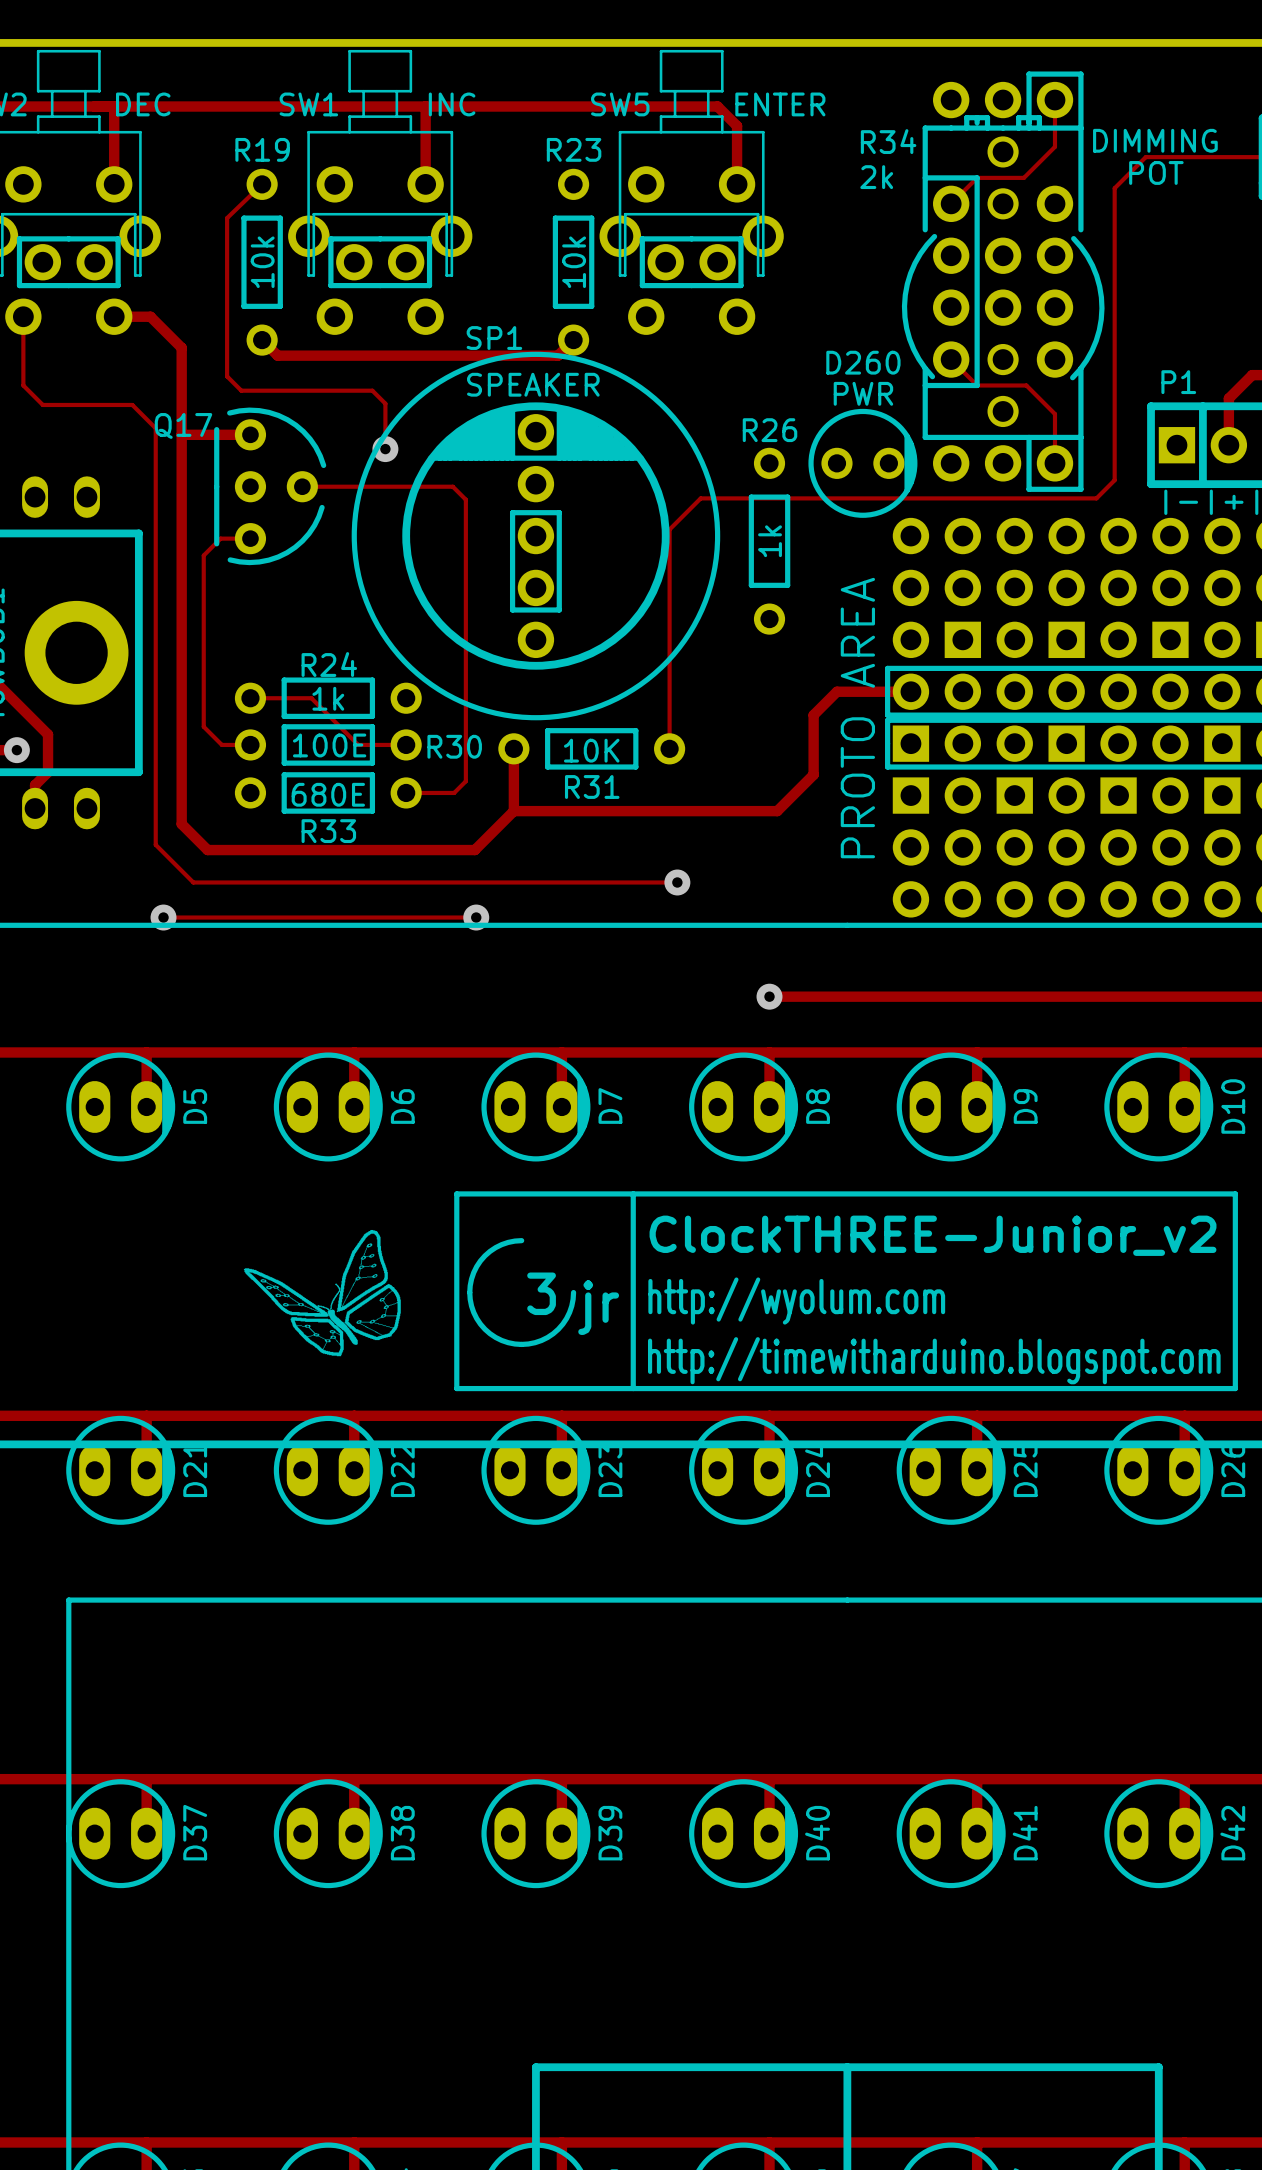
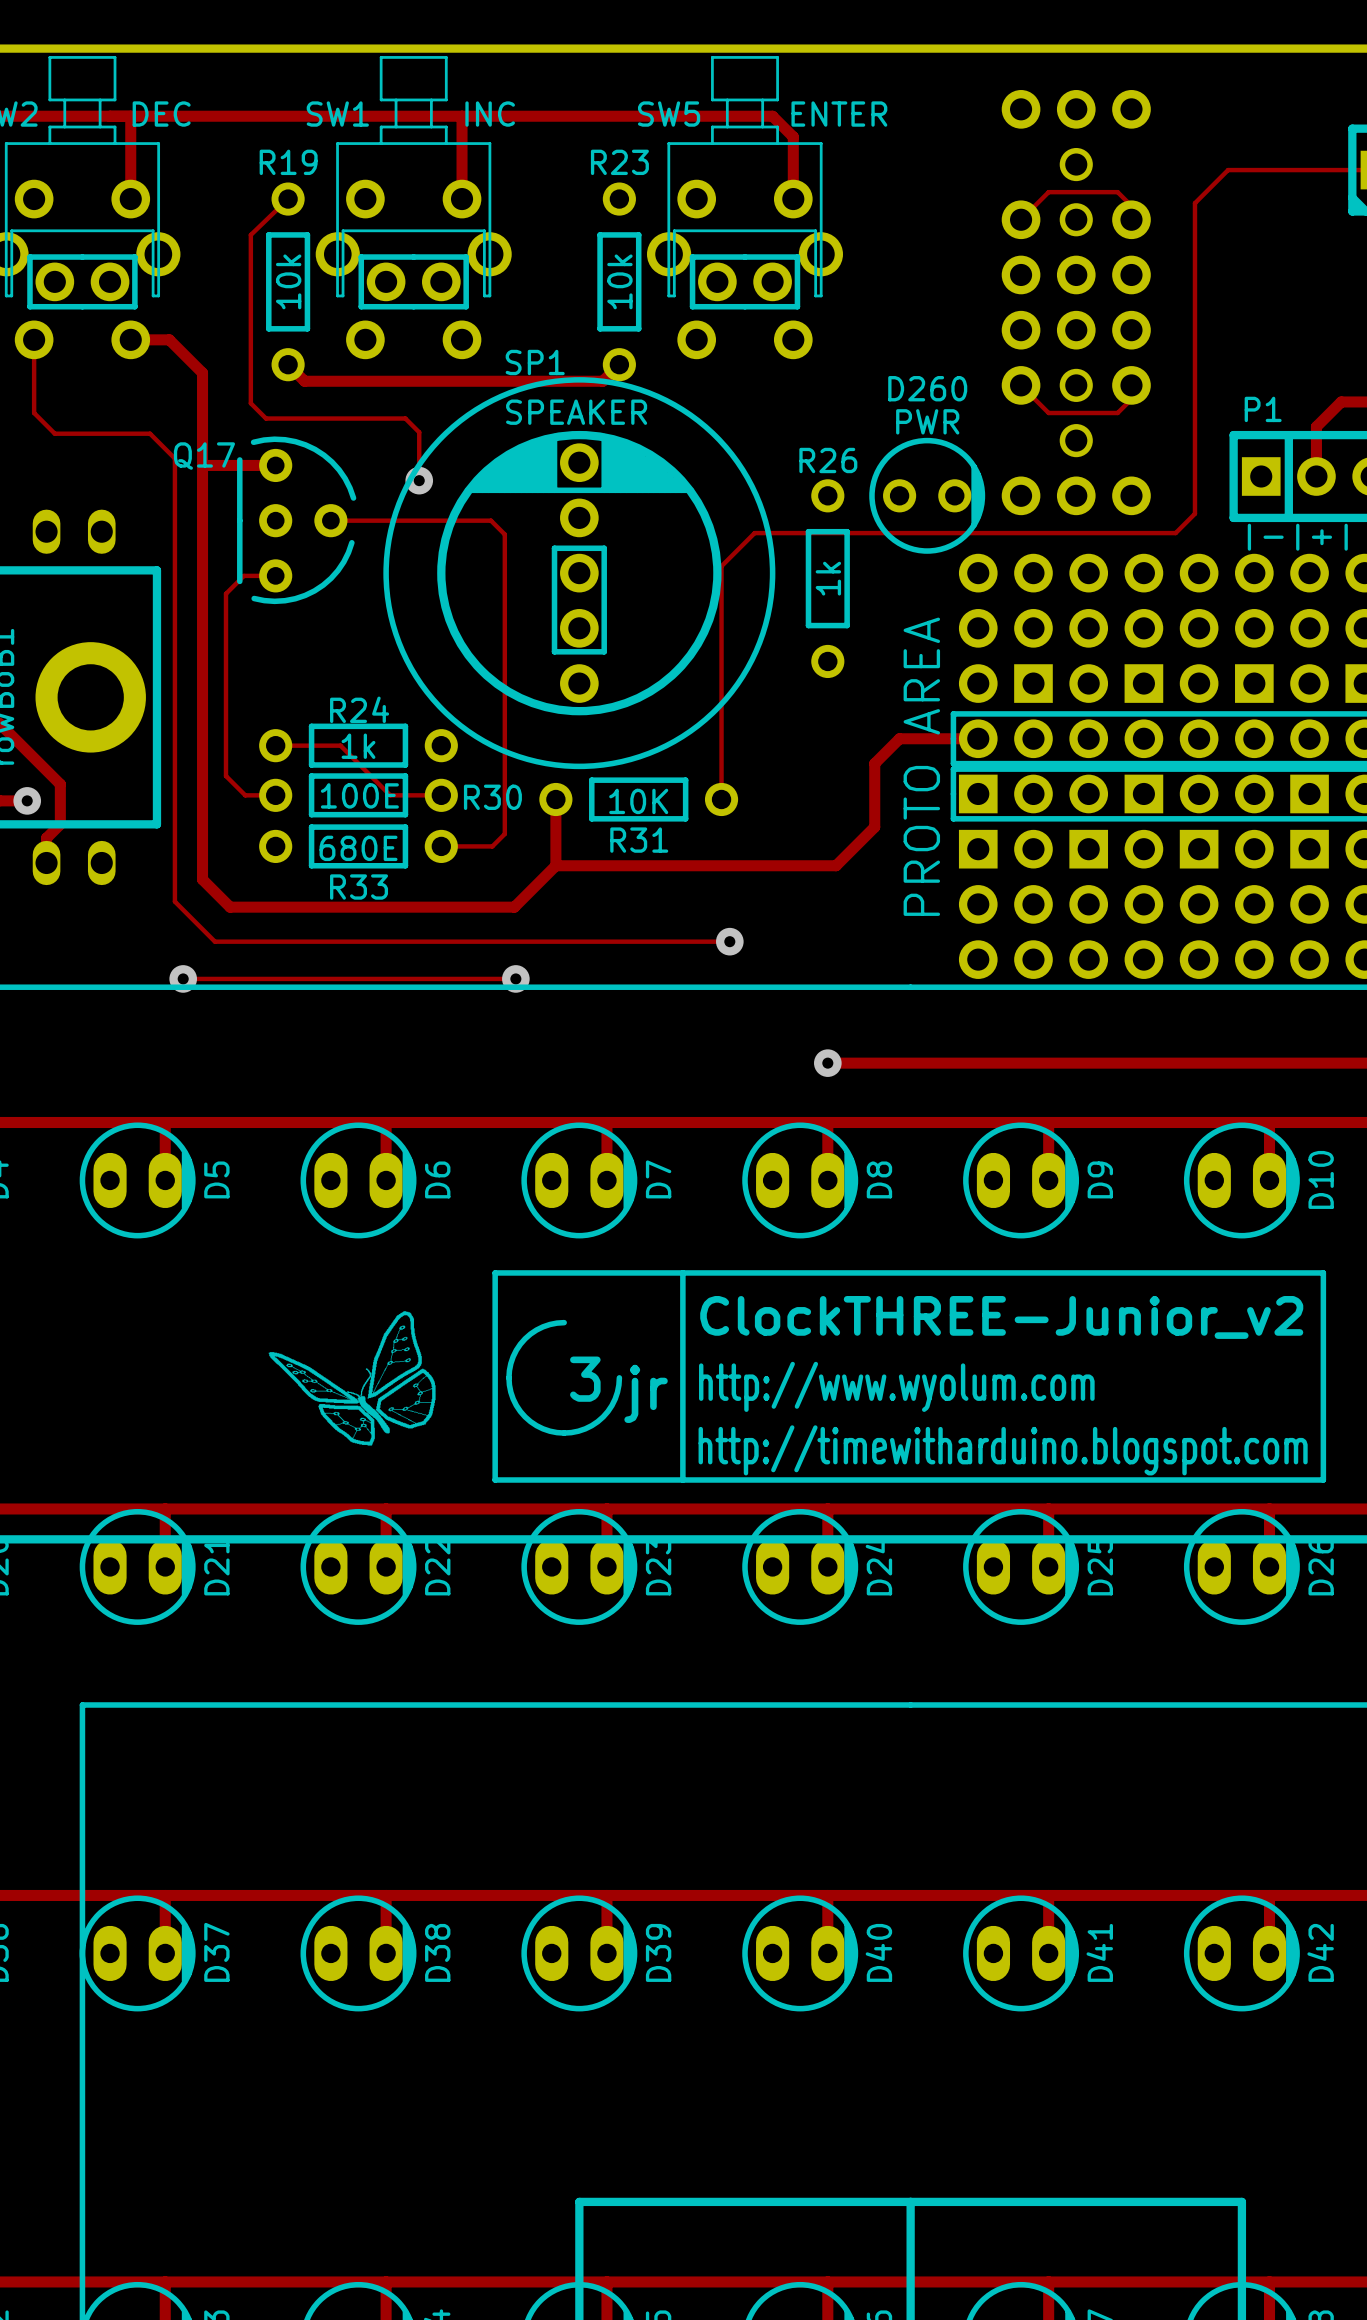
track: (1054, 100) (1054, 146) (1023, 177) -> (1131, 219) (1131, 205) (1117, 192) (1098, 192)
line: (1029, 127) (1029, 74) (1080, 74) (1080, 128) -> none
text: DIMMING (1155, 140) -> none
text: POT (1156, 172) -> none
line: (925, 177) (977, 177) (977, 385) (925, 385) -> none
R34 side: top (1003, 281) -> bottom (1076, 302)
track: (1026, 385) (1054, 414) (1054, 463) -> (1101, 413) (1117, 413) (1131, 399) (1131, 385)
line: (1029, 437) (1029, 489) (1080, 489) (1080, 437) -> none
text: http://wyolum.com (796, 1301) -> http://www.wyolum.com (896, 1386)

